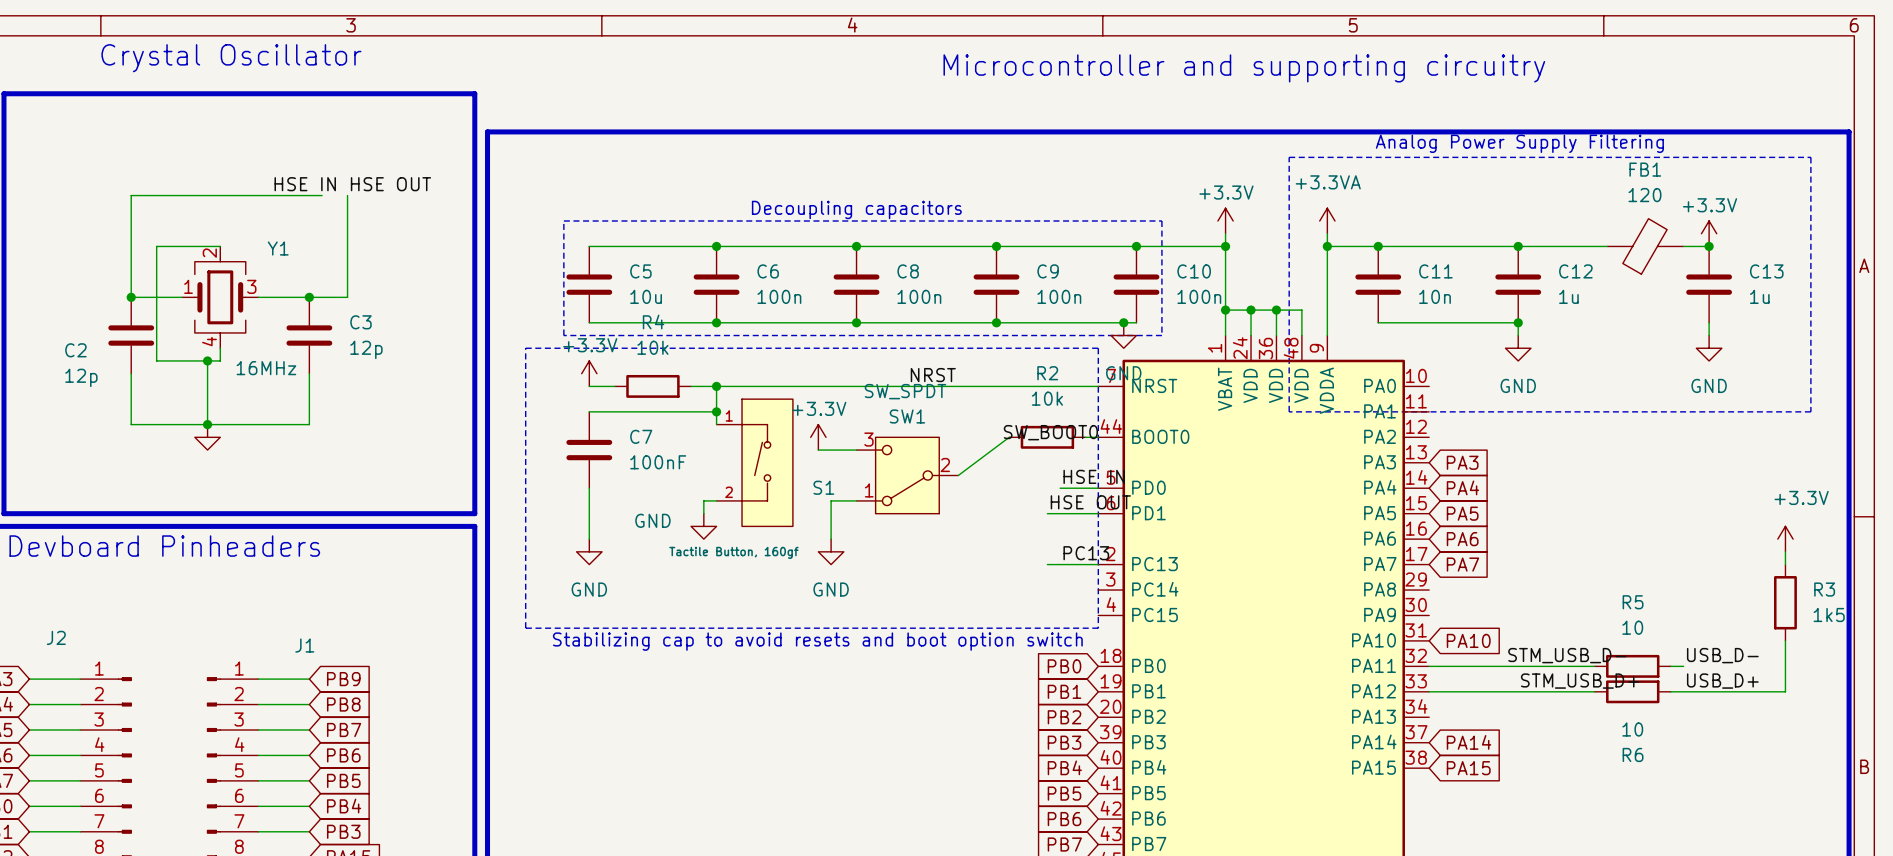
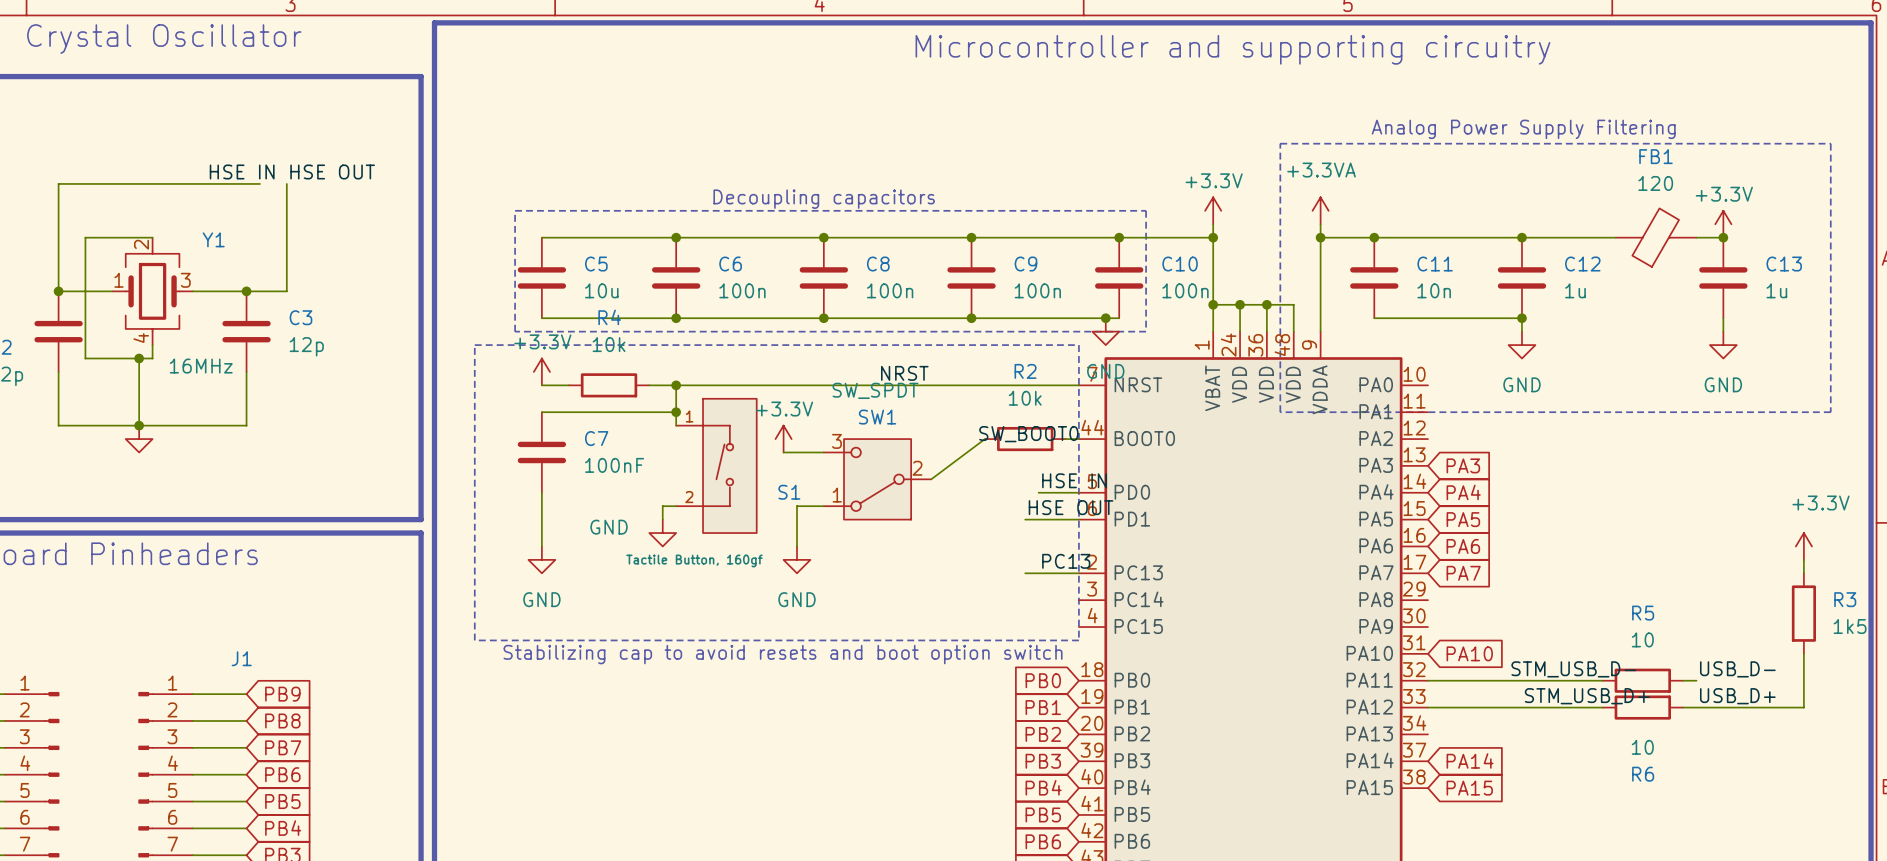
line: (487, 131) (1849, 131) -> (434, 116) (434, 22) (1871, 22) (1871, 116)

